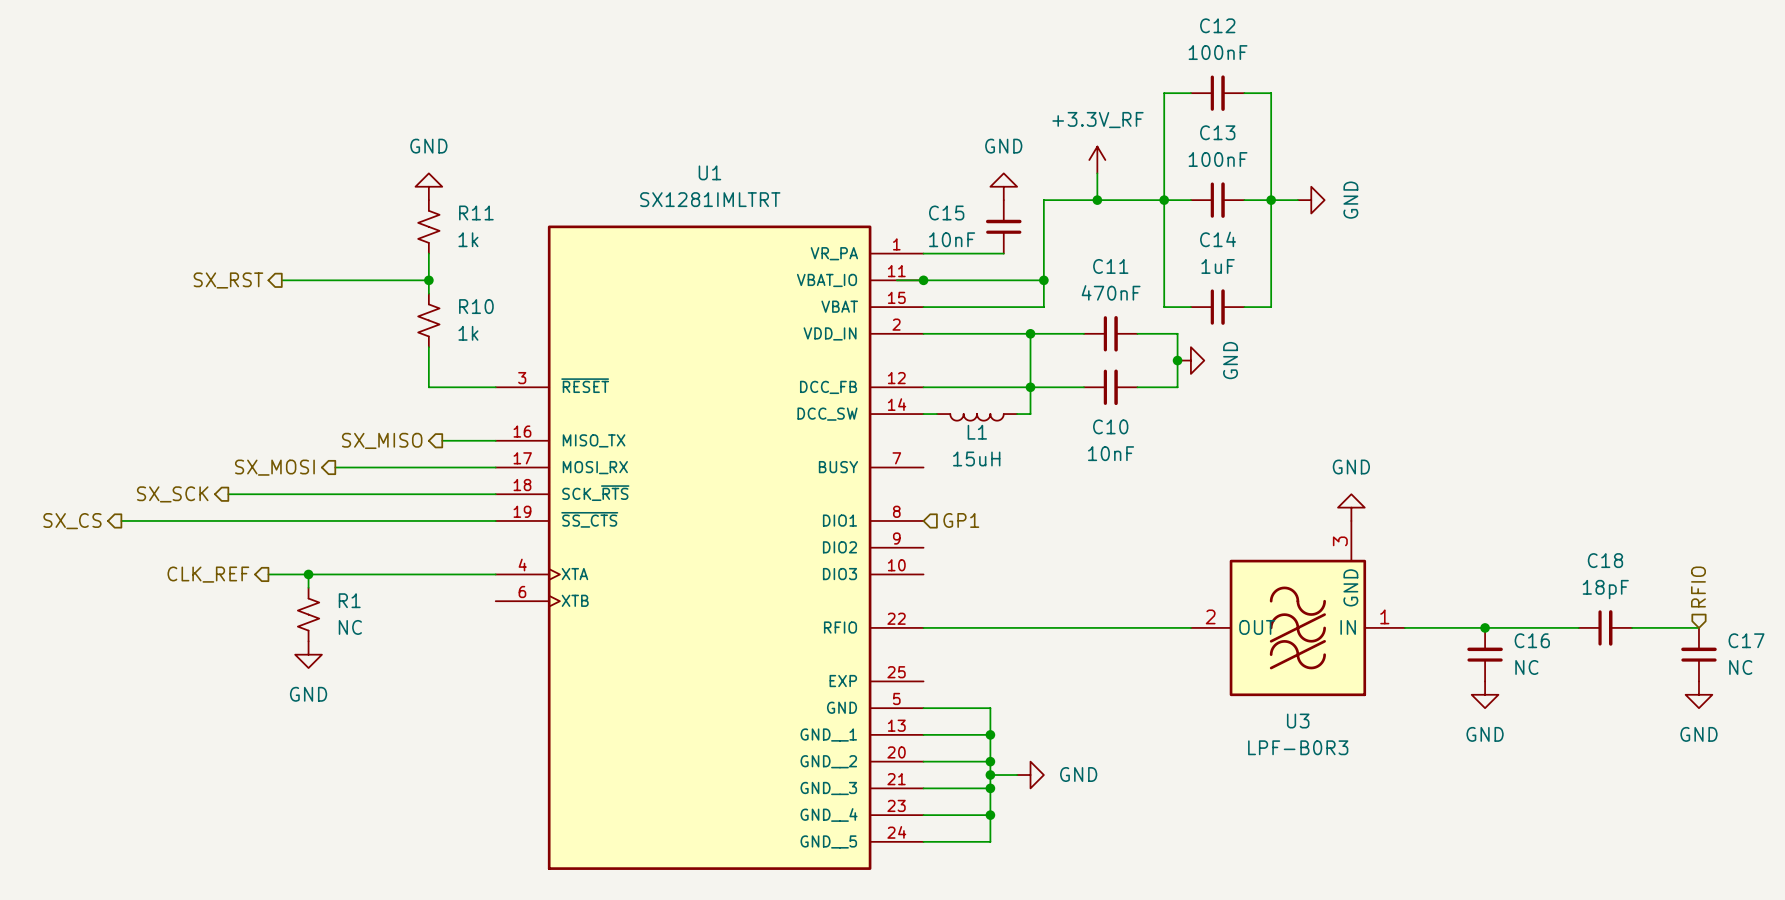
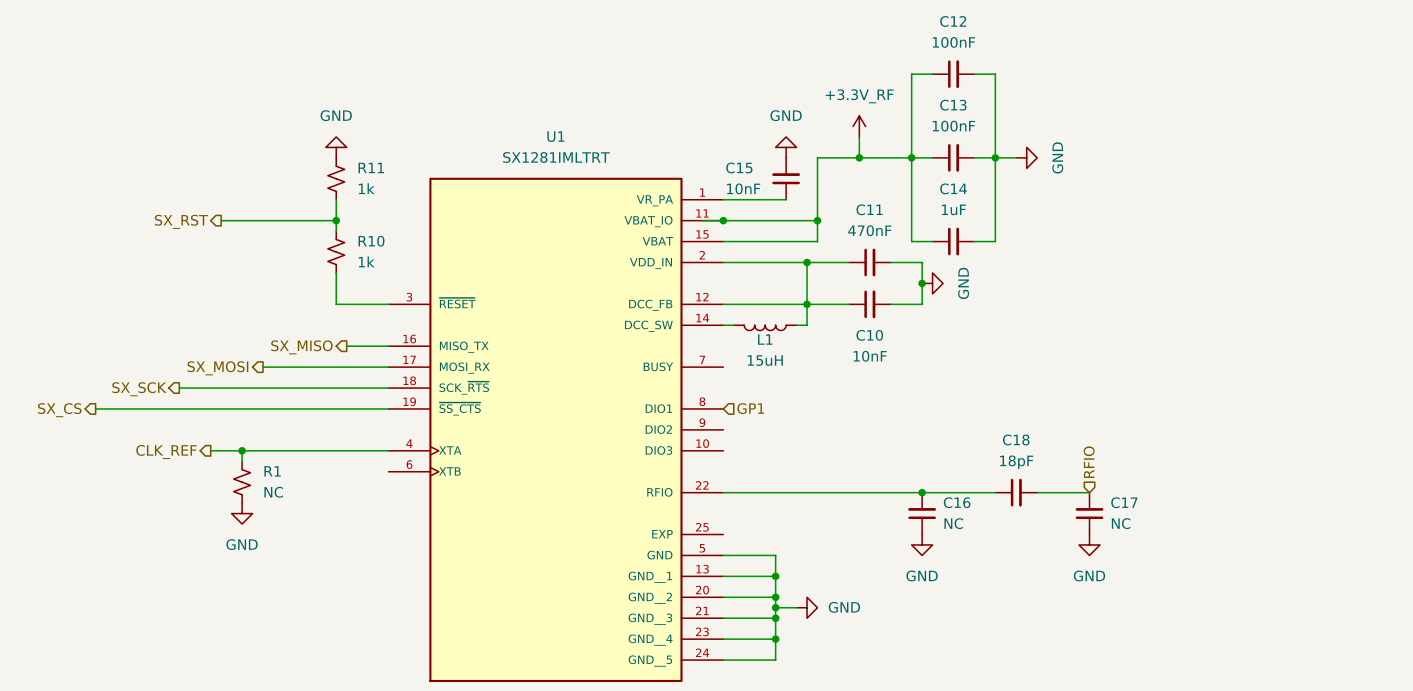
power symbol: GND (1351, 507) -> none
hierarchical label: none -> RFIO (1089, 462)
hierarchical label: RFIO (1698, 586) -> none
U3: LPF-B0R3 (1297, 608) -> none
junction: none -> (922, 492)
wire: (1404, 627) (1578, 627) -> none
junction: (1485, 627) -> none
C18 position: (1605, 627) -> (1016, 492)
wire: (1632, 627) (1698, 627) -> none
C16 position: (1485, 654) -> (922, 513)
C17 position: (1698, 654) -> (1089, 513)
power symbol: none -> GND (922, 544)
power symbol position: GND (1485, 694) -> GND (1089, 544)
power symbol: GND (1698, 694) -> none

